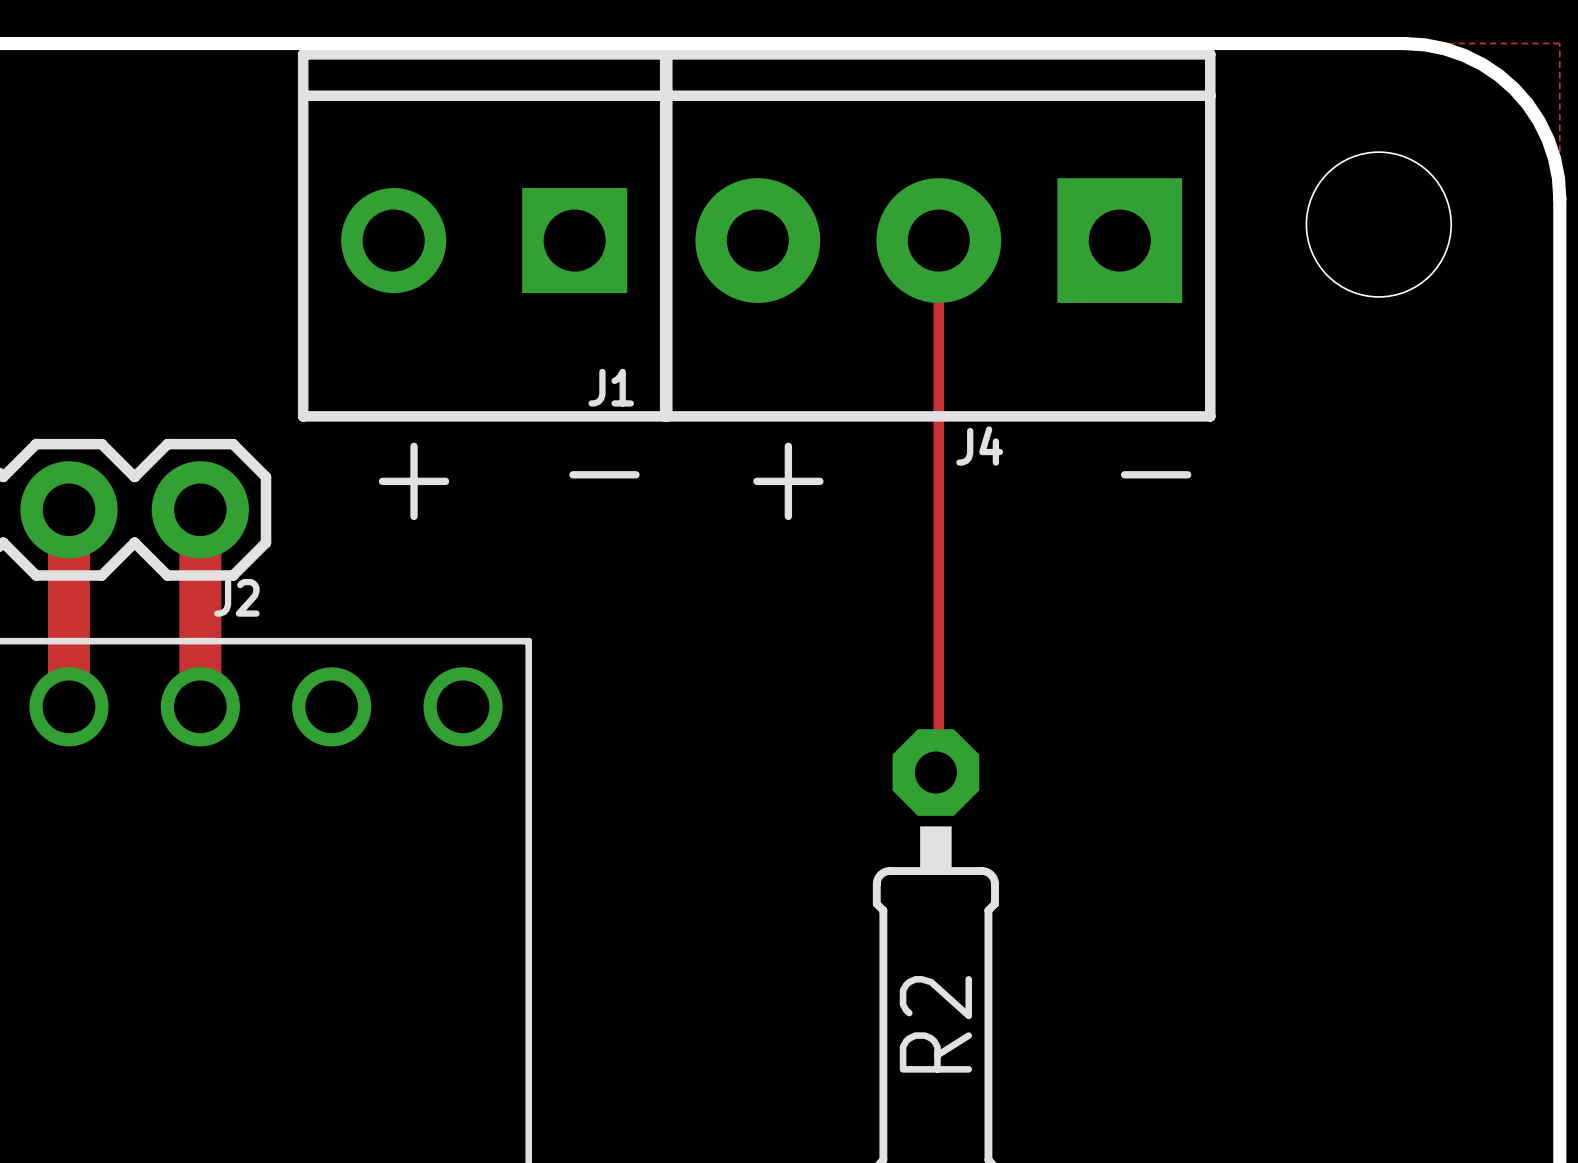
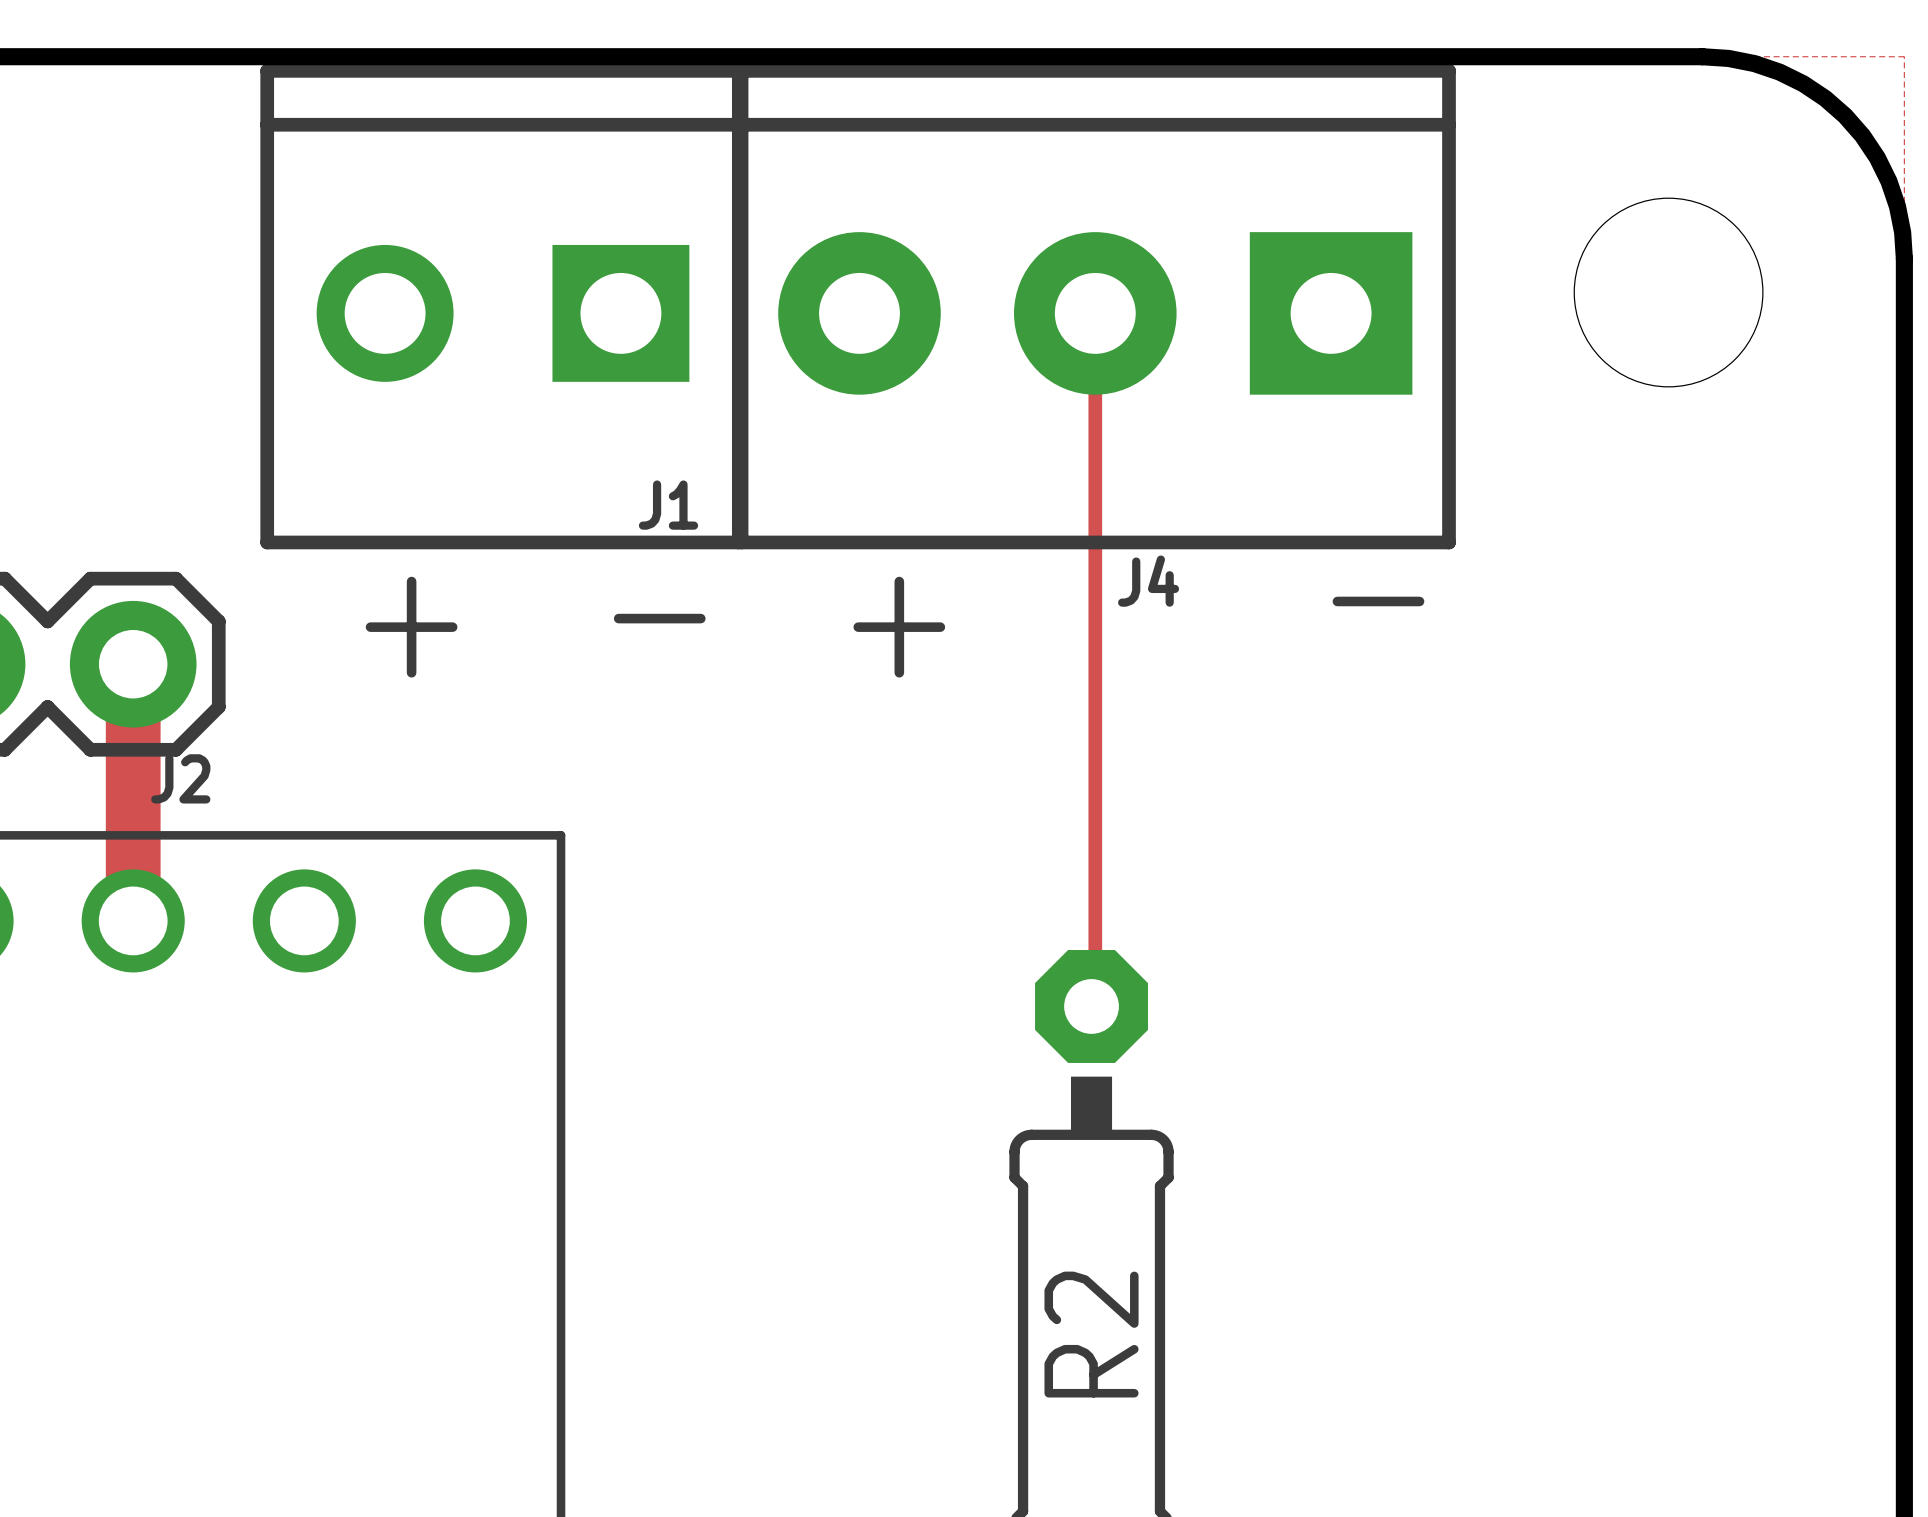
text position: - (1156, 474) -> - (1378, 601)

